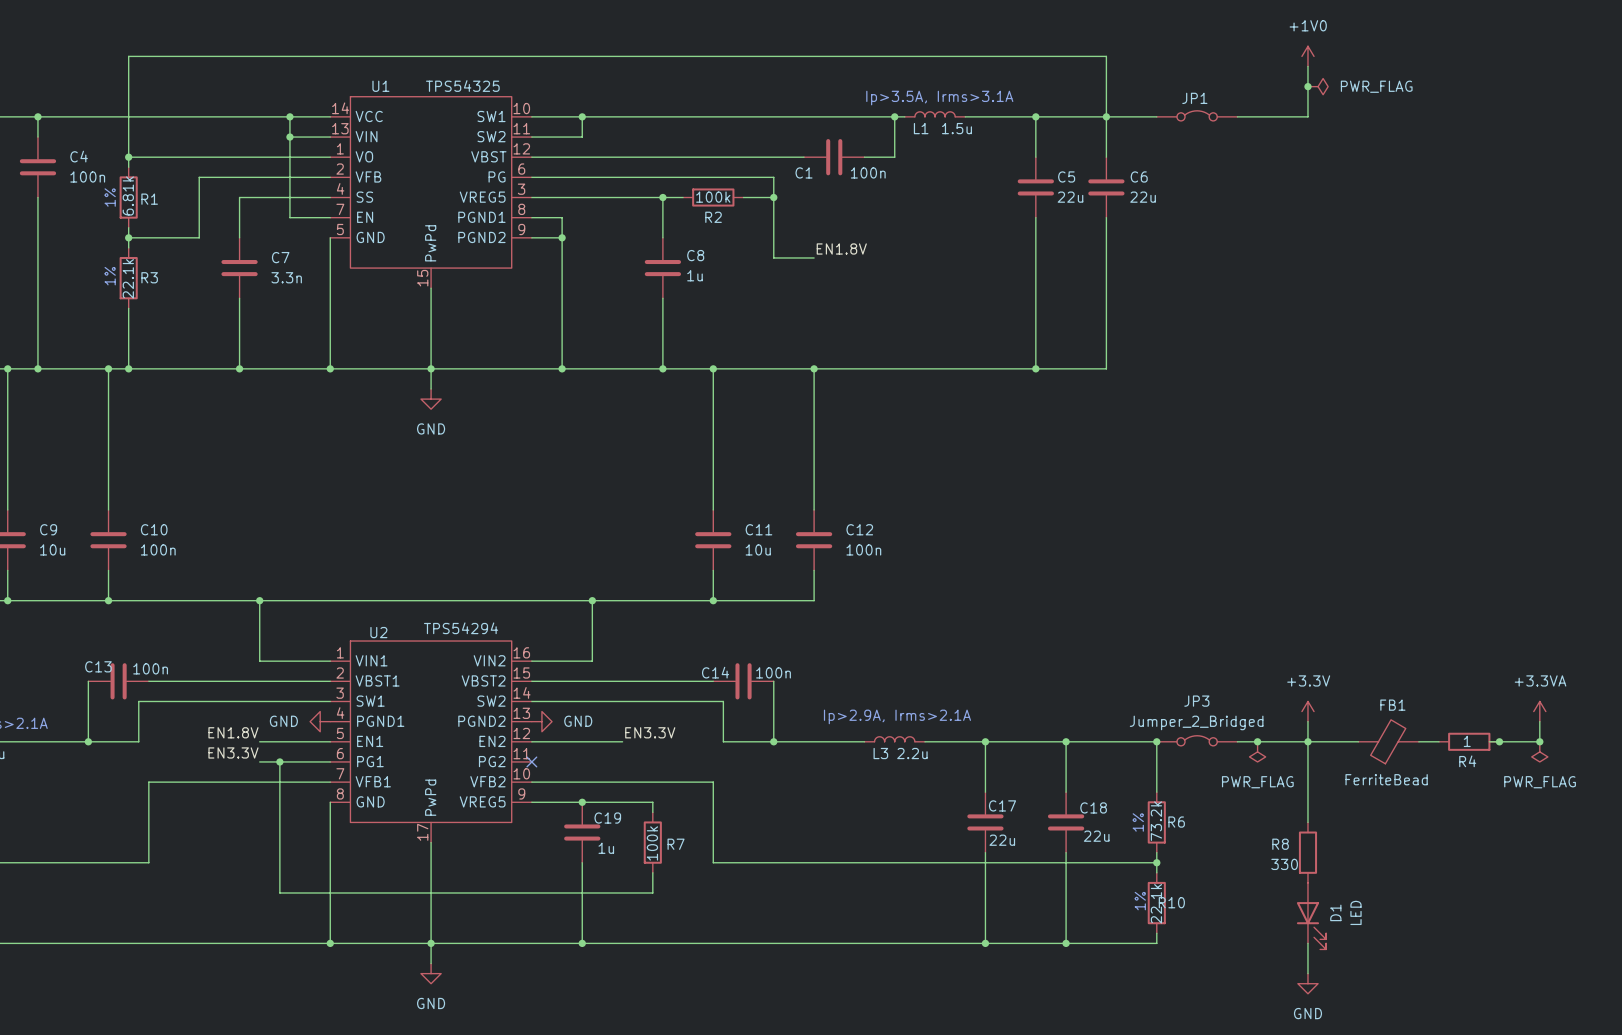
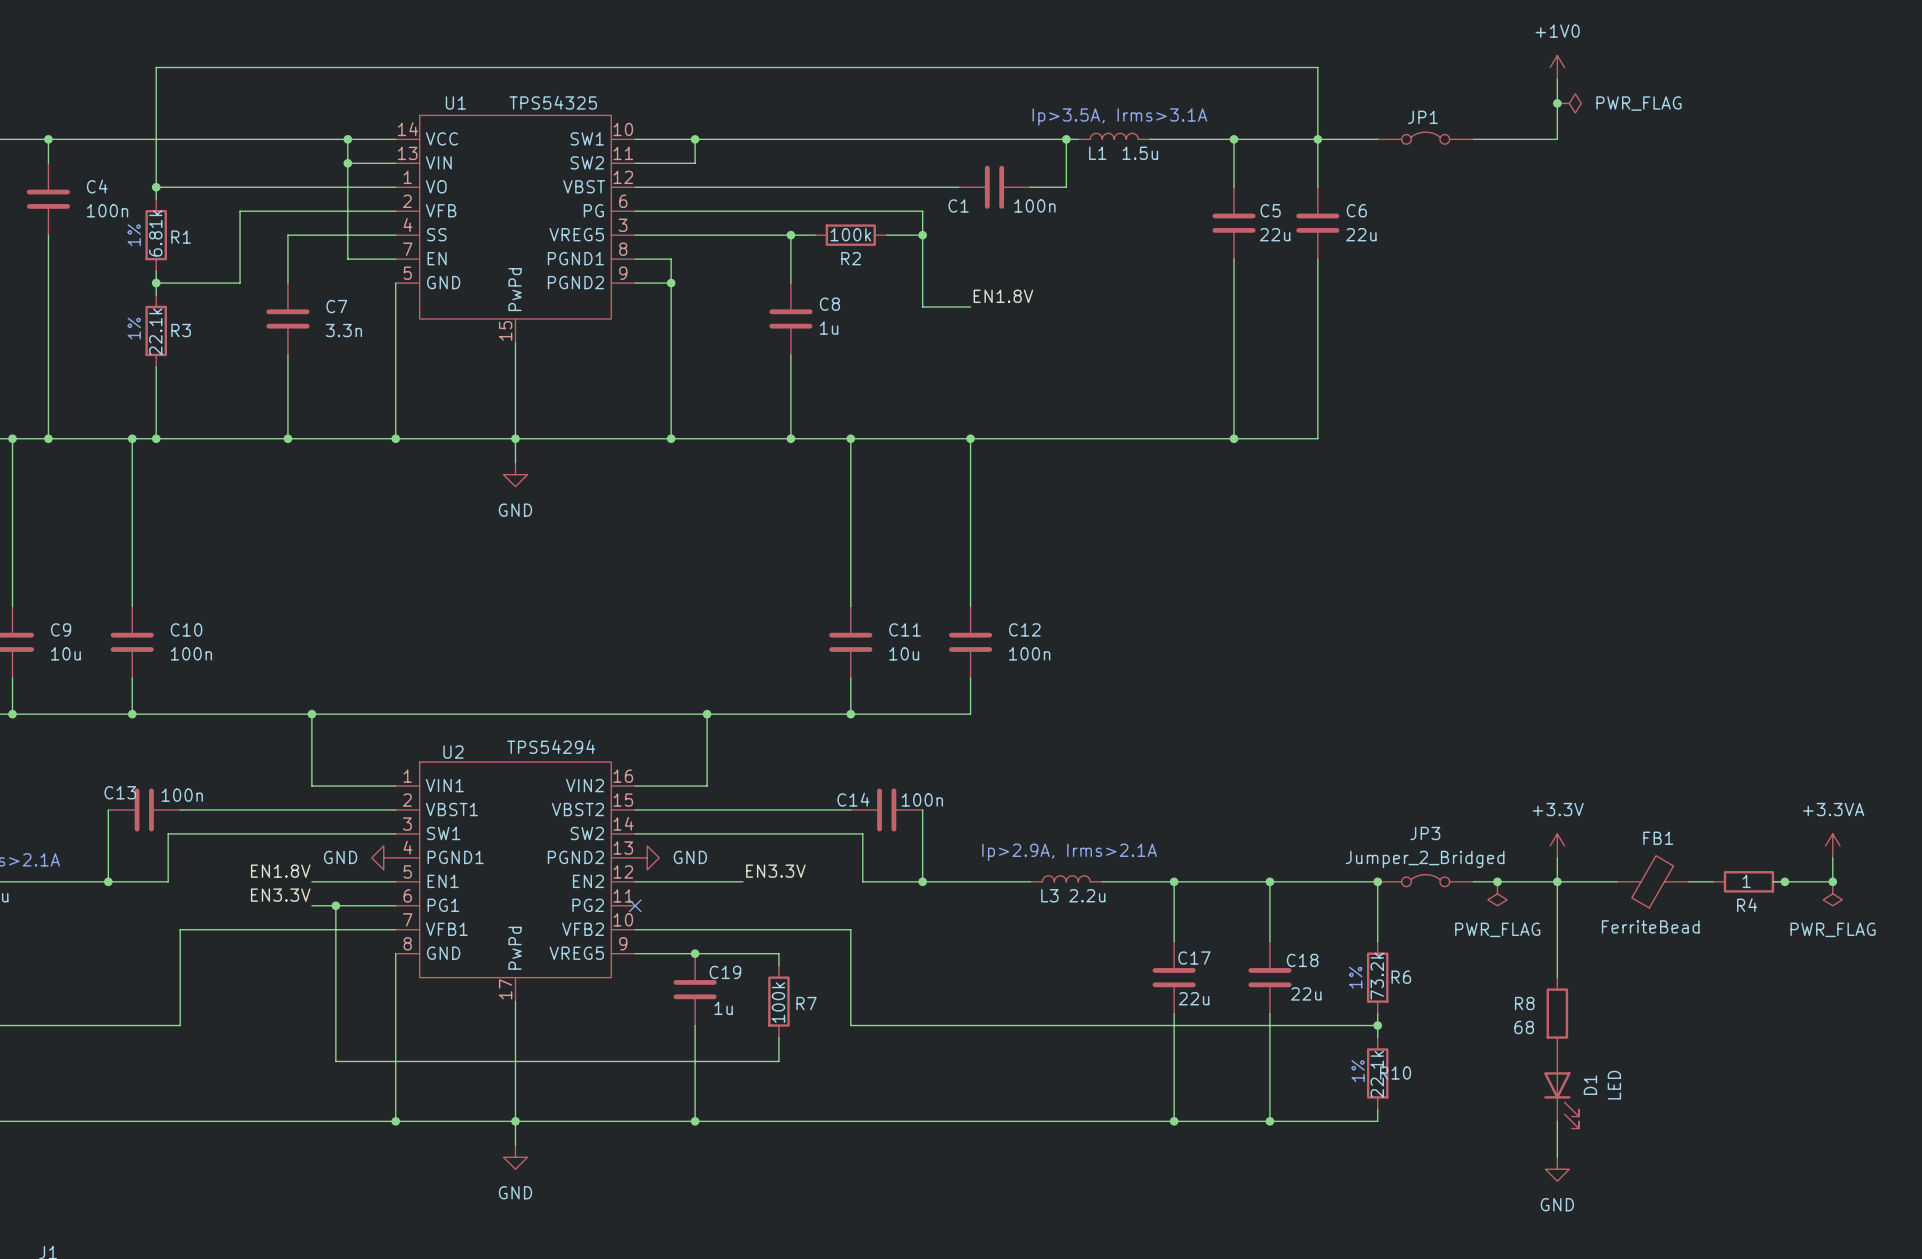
R8 value: 330 (1284, 864) -> 68 (1524, 1027)

